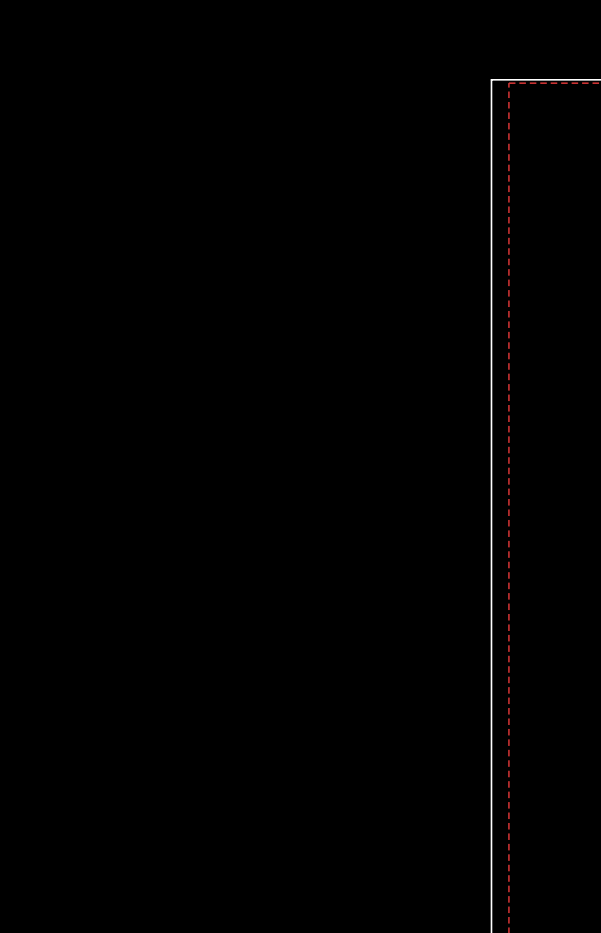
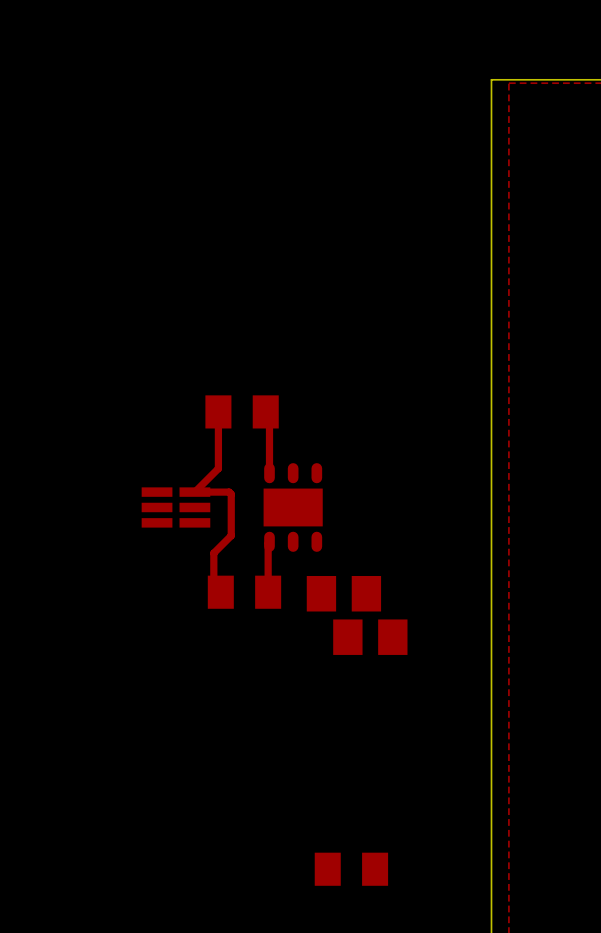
top track: none -> (218, 411) (218, 468) (194, 492) (229, 492) (231, 494) (231, 535) (213, 553) (213, 585) (220, 592)
part: none -> (242, 411)
top track: none -> (265, 411) (269, 415) (269, 473)
part: none -> (175, 507)
part: none -> (293, 507)
top track: none -> (269, 541) (268, 592)
part: none -> (244, 592)
part: none -> (343, 593)
part: none -> (370, 637)
part: none -> (351, 869)

